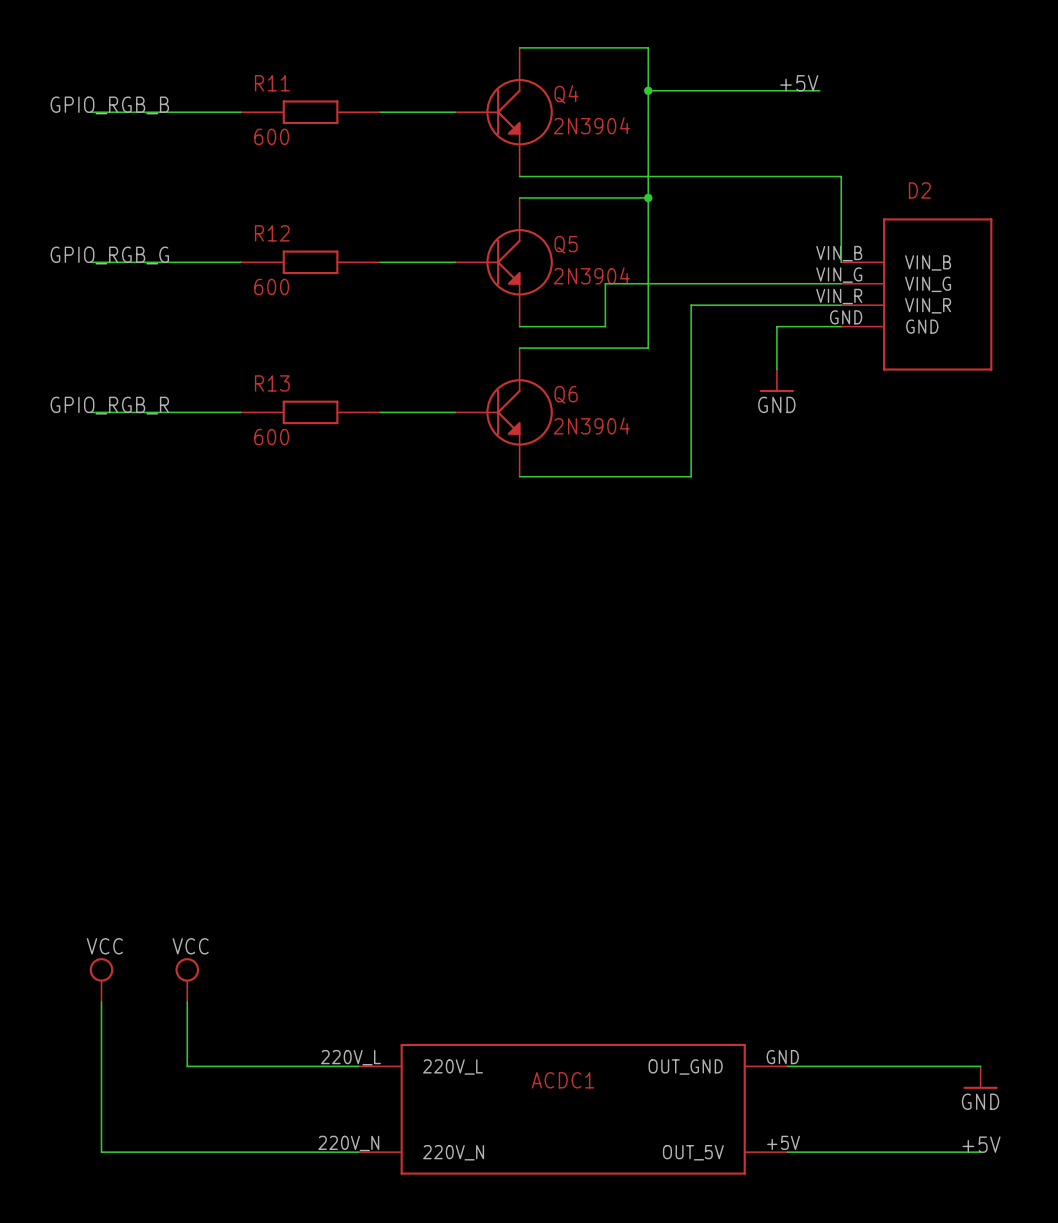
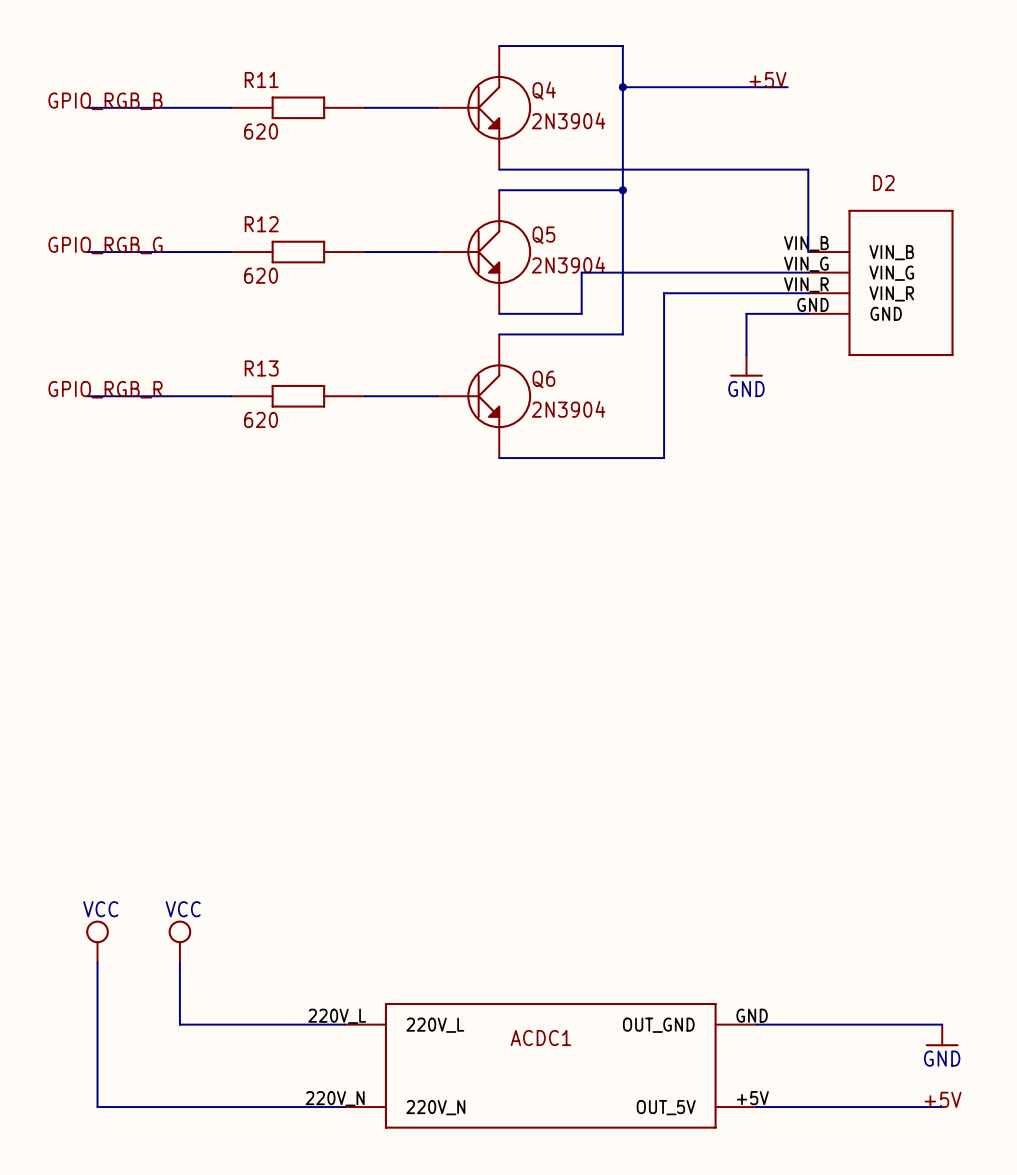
R11 value: 600 (271, 136) -> 620 (261, 131)
R12 value: 600 (271, 286) -> 620 (261, 275)
R13 value: 600 (271, 437) -> 620 (261, 419)

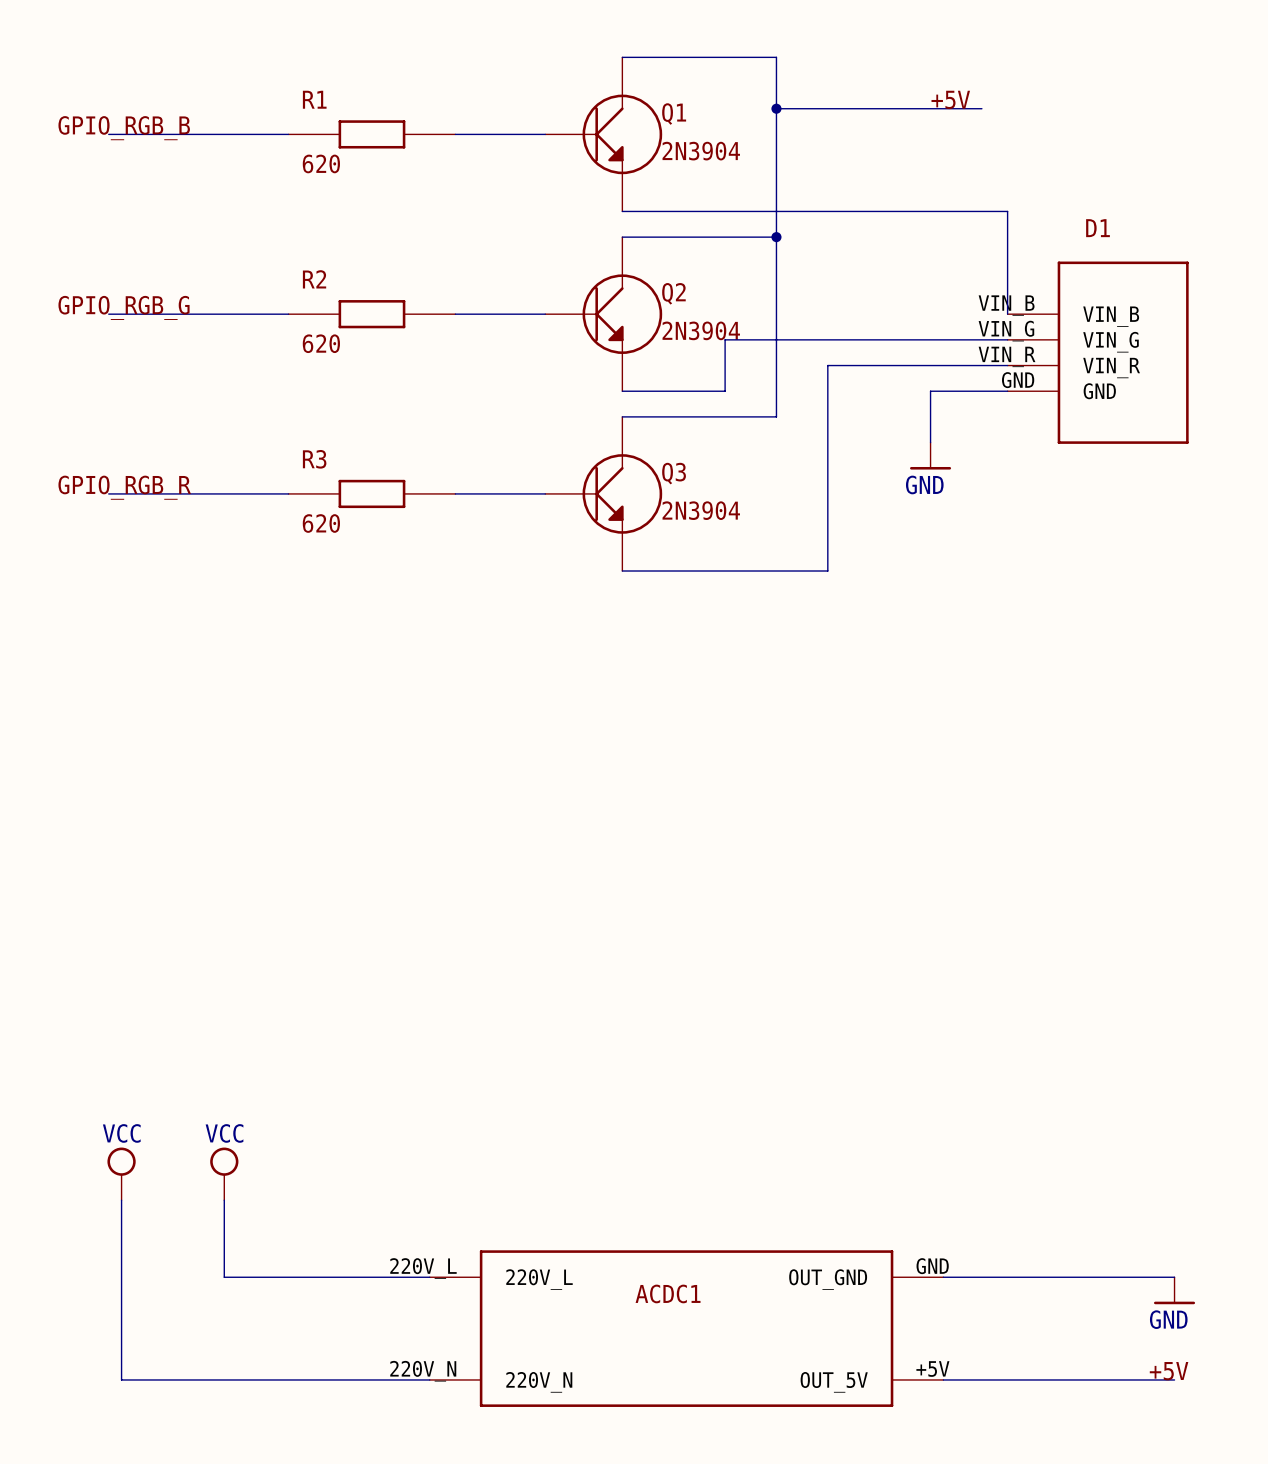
R11 name: R11 (261, 80) -> R1 (314, 99)
Q4 name: Q4 (544, 90) -> Q1 (674, 114)
D2 name: D2 (883, 183) -> D1 (1097, 228)
R12 name: R12 (261, 224) -> R2 (314, 279)
Q5 name: Q5 (543, 235) -> Q2 (673, 293)
R13 name: R13 (261, 368) -> R3 (314, 459)
Q6 name: Q6 (543, 379) -> Q3 (674, 473)

